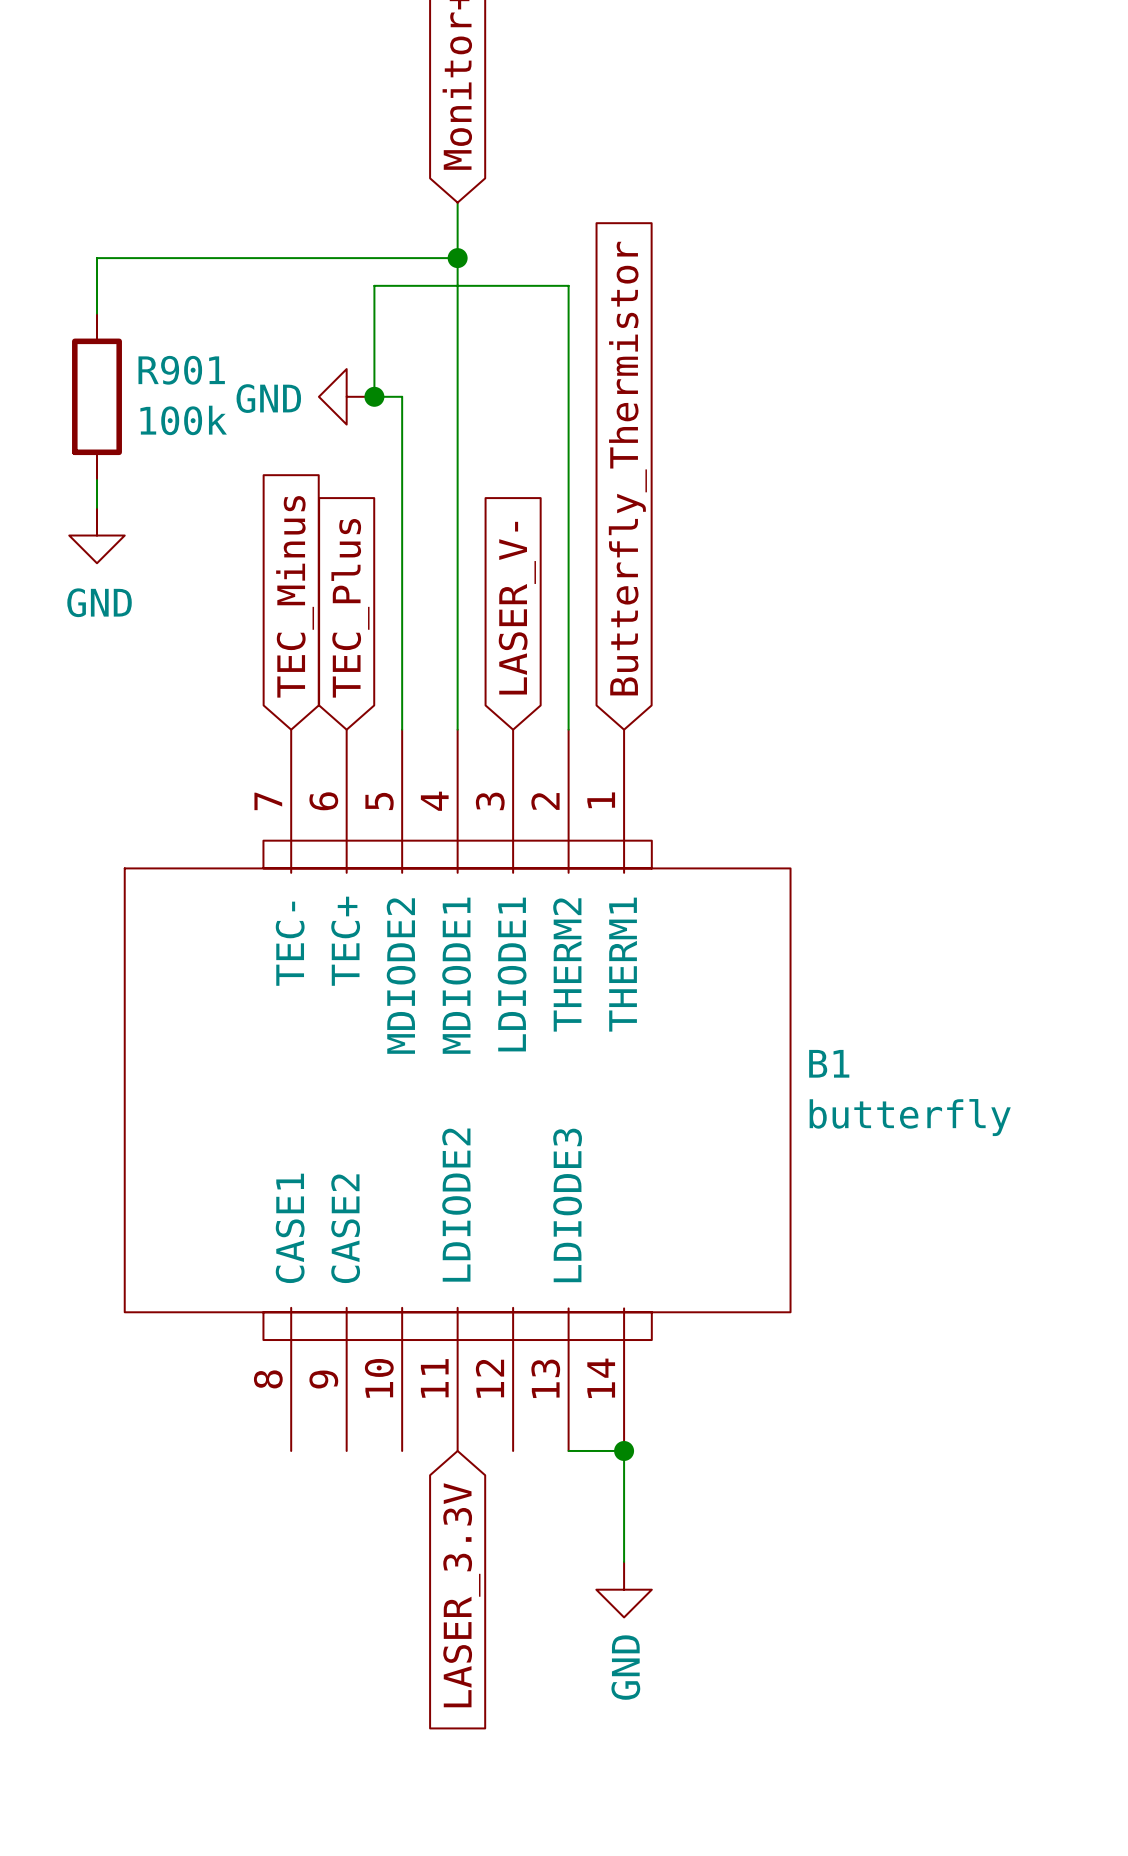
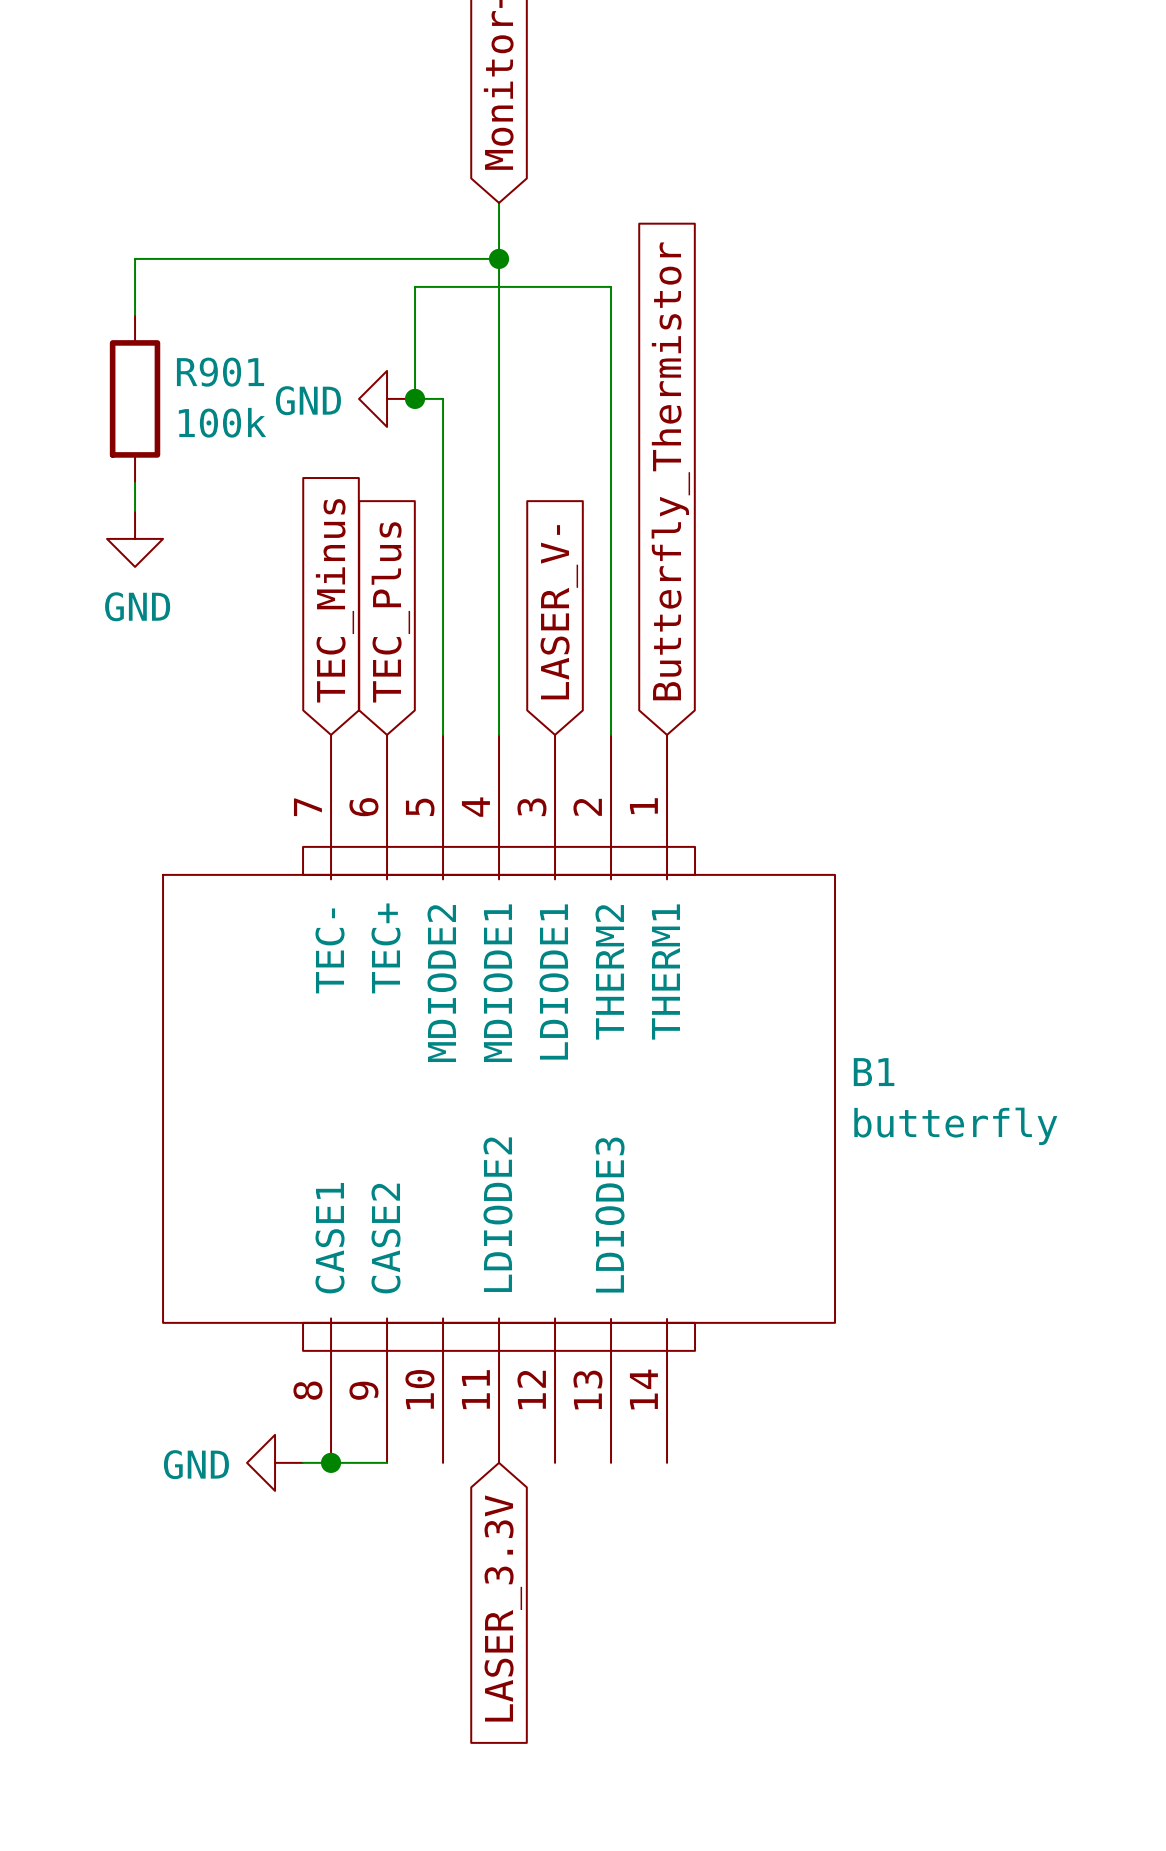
wire: none -> (303, 1462) (387, 1462)
junction: none -> (331, 1462)
wire: (568, 1450) (624, 1450) (624, 1561) -> none
junction: (624, 1450) -> none
power symbol rotation: 0° (624, 1589) -> 90° clockwise (275, 1462)
power symbol position: GND (624, 1589) -> GND (275, 1462)

